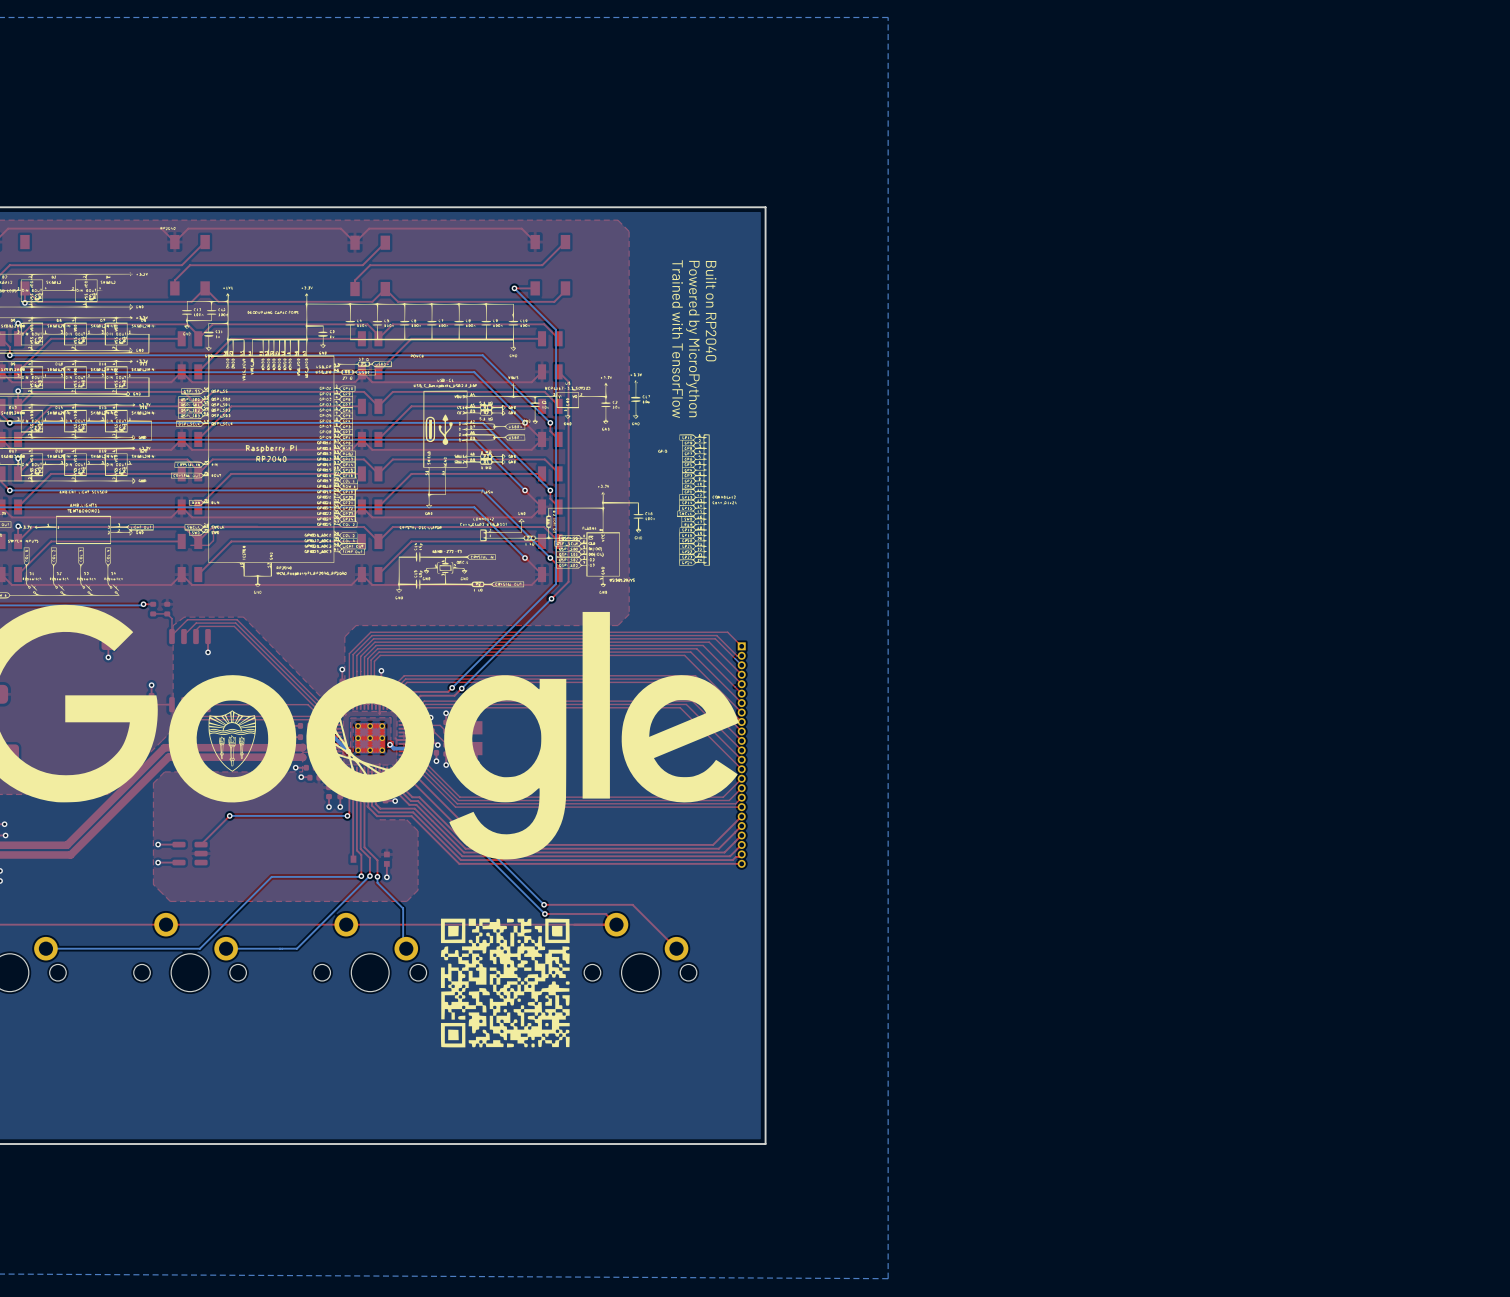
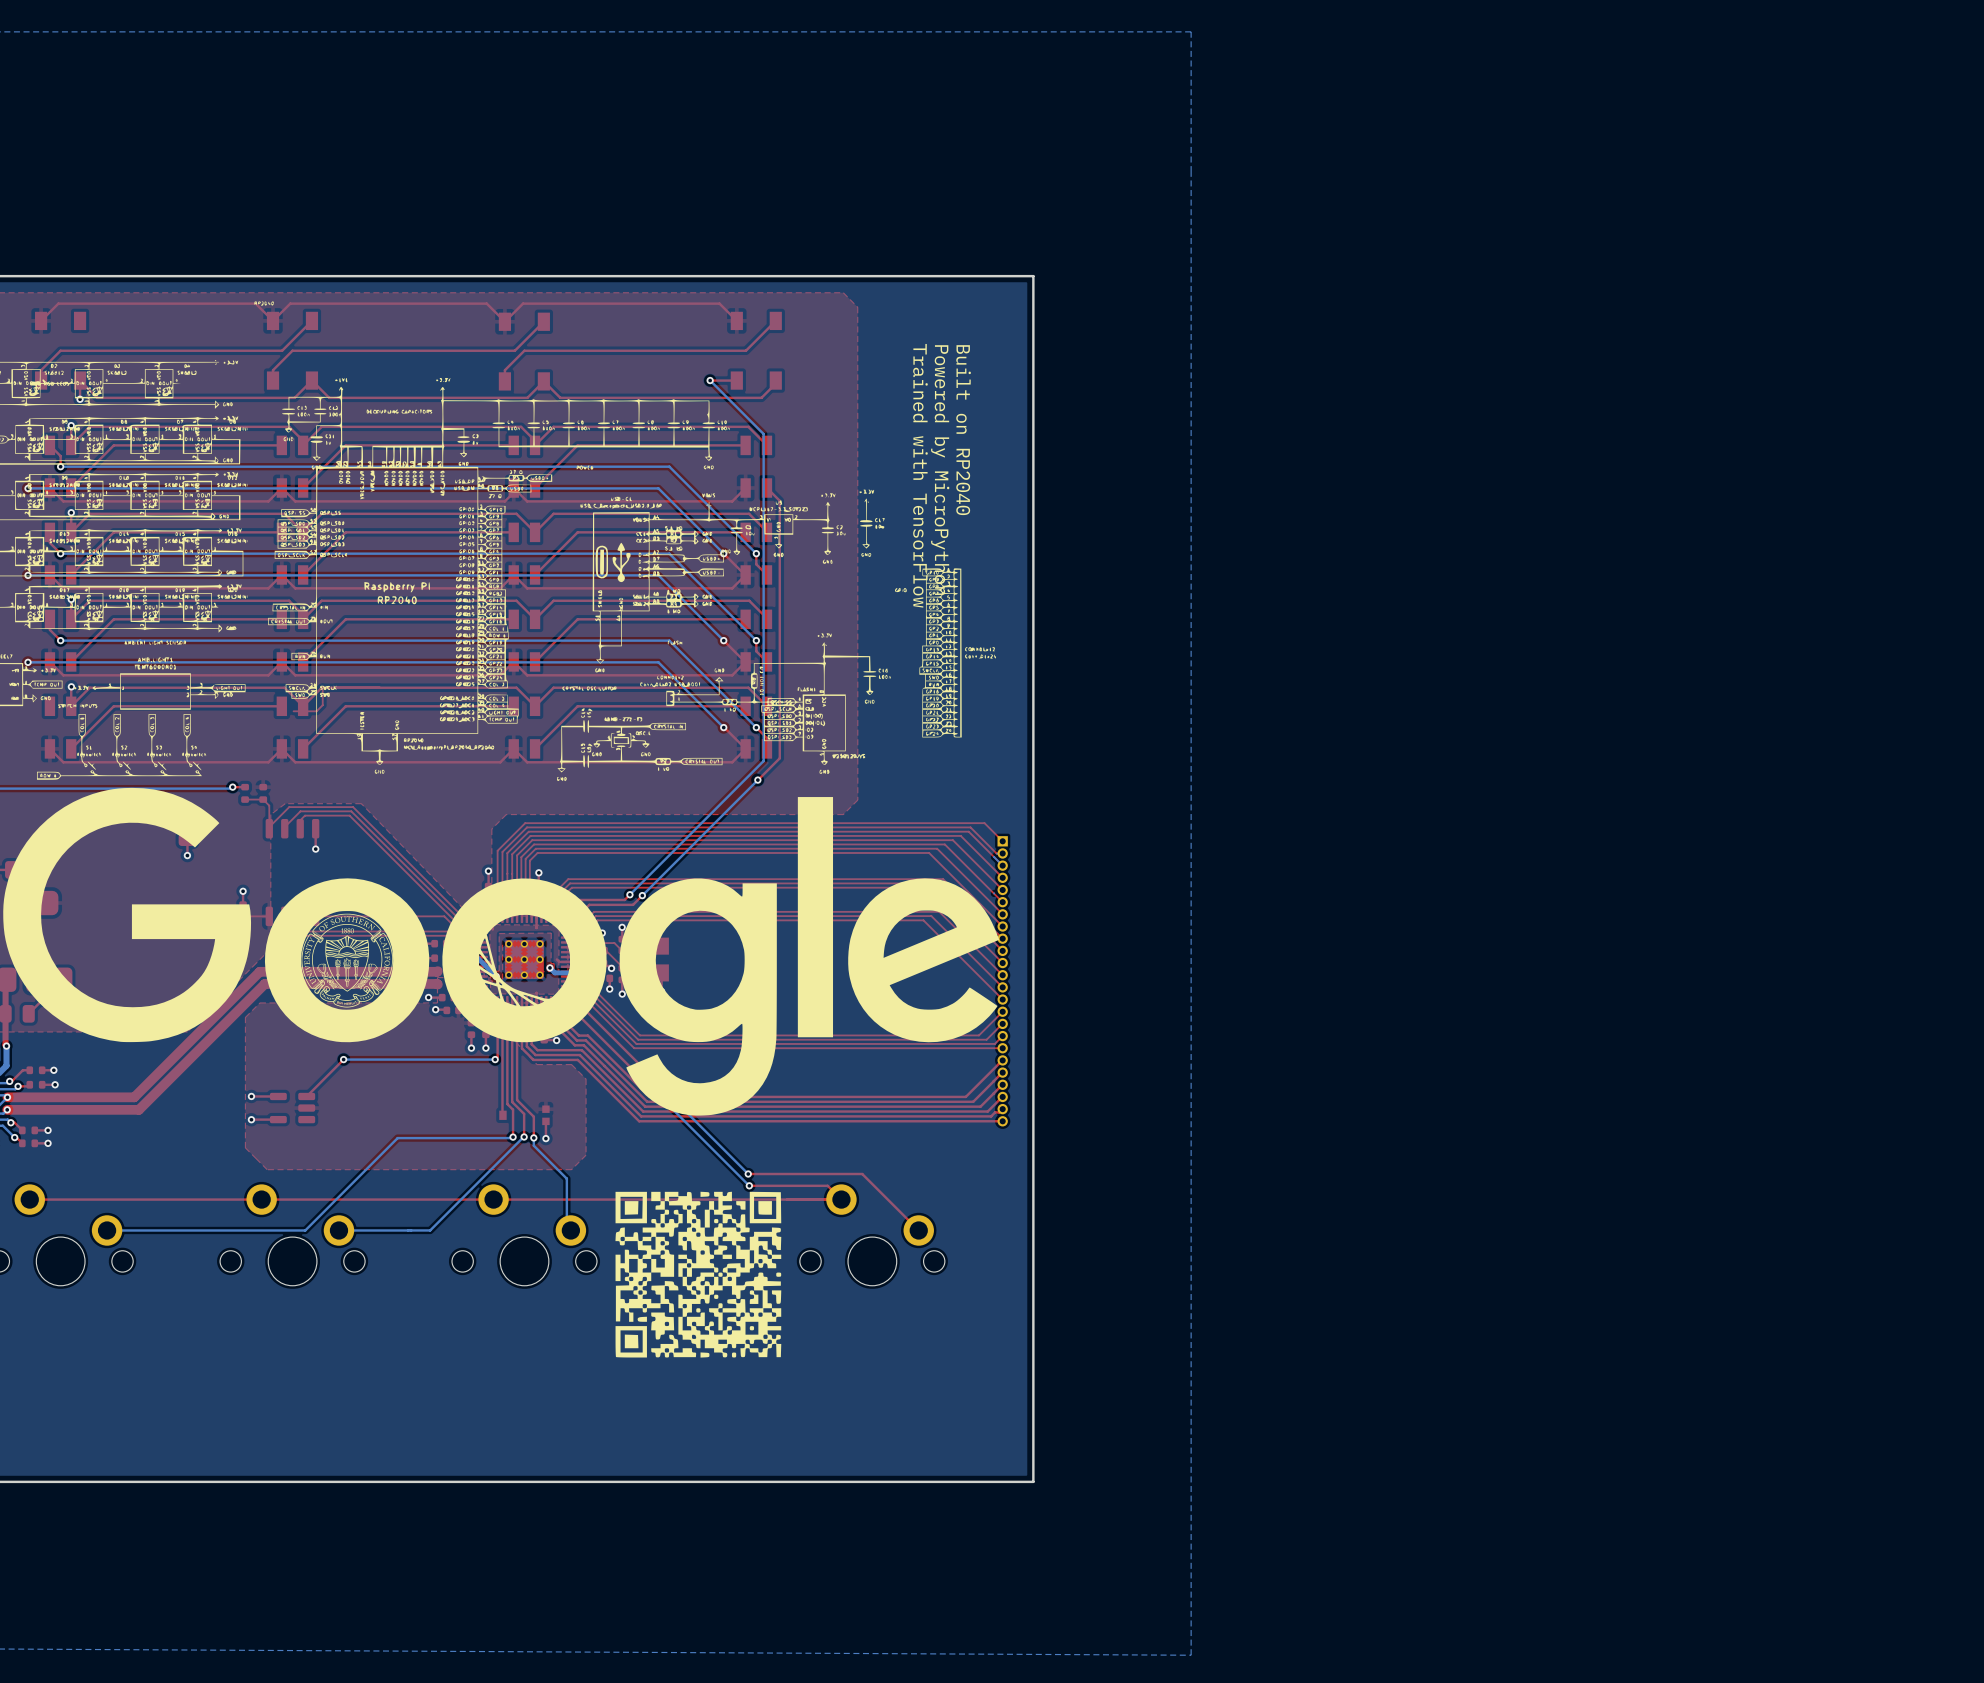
drawing shape: [208, 710, 257, 772] -> [301, 913, 393, 1008]

